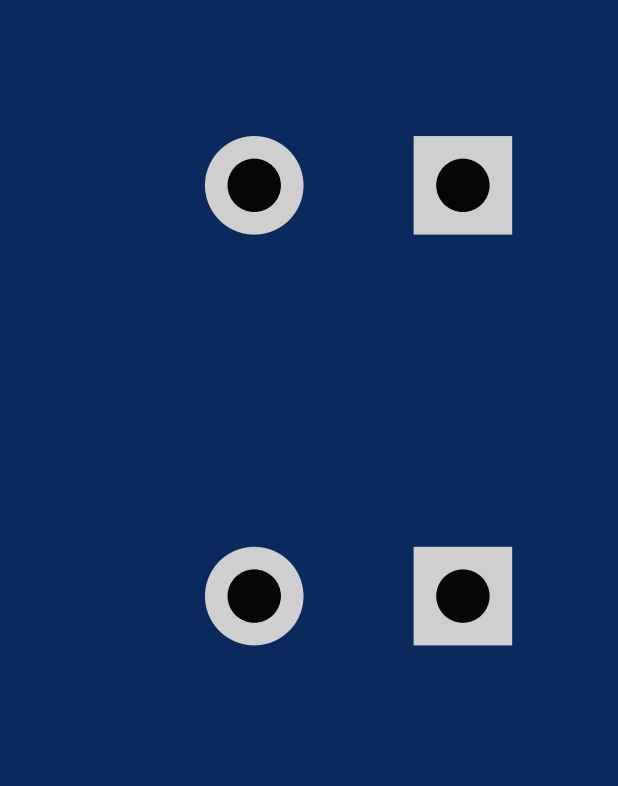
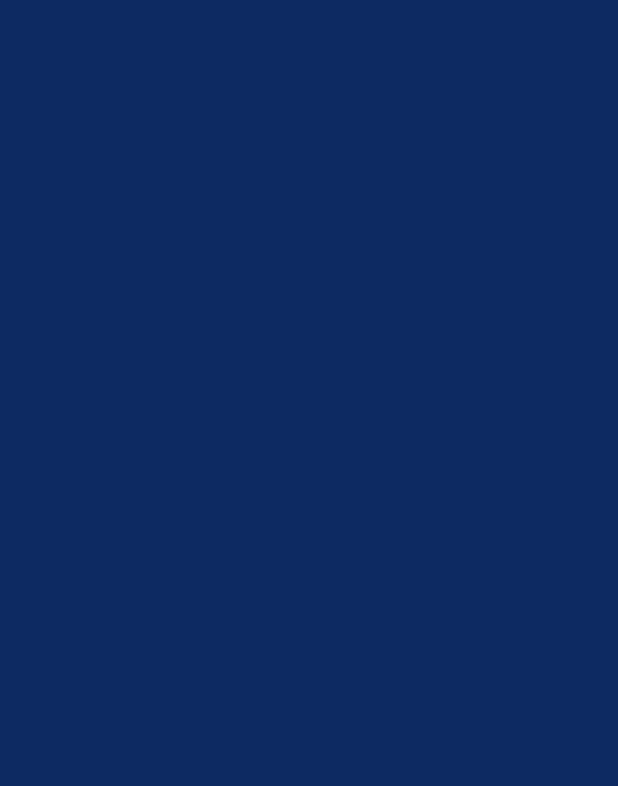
part: (358, 185) -> none
part: (358, 596) -> none

